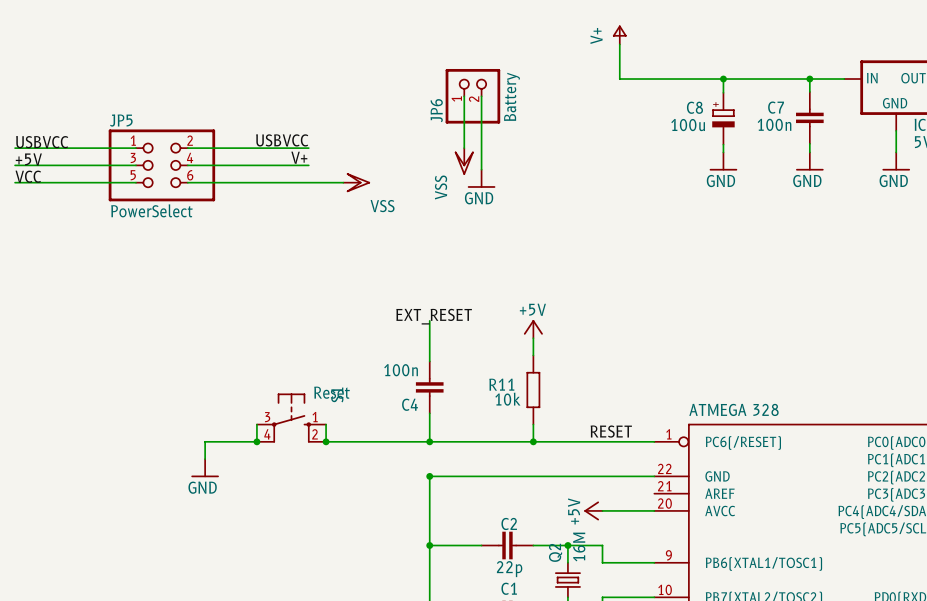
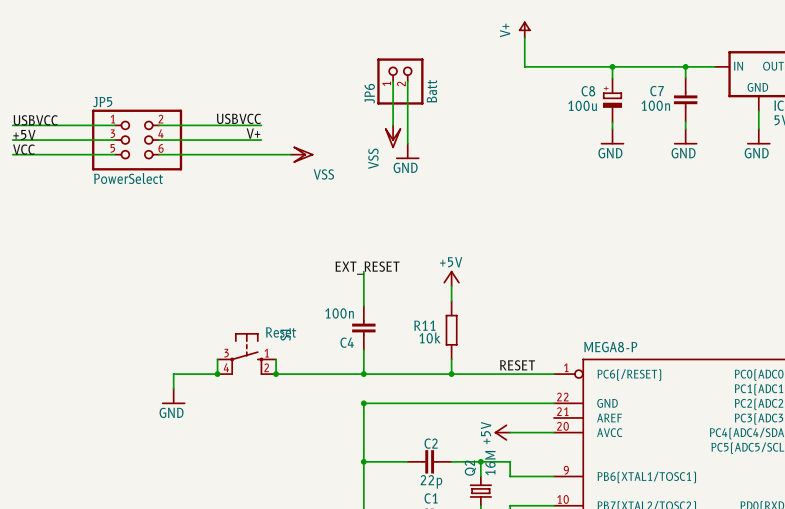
JP6 value: Battery (512, 96) -> Batt (431, 91)
part value: ATMEGA 328 (733, 409) -> MEGA8-P (610, 347)

